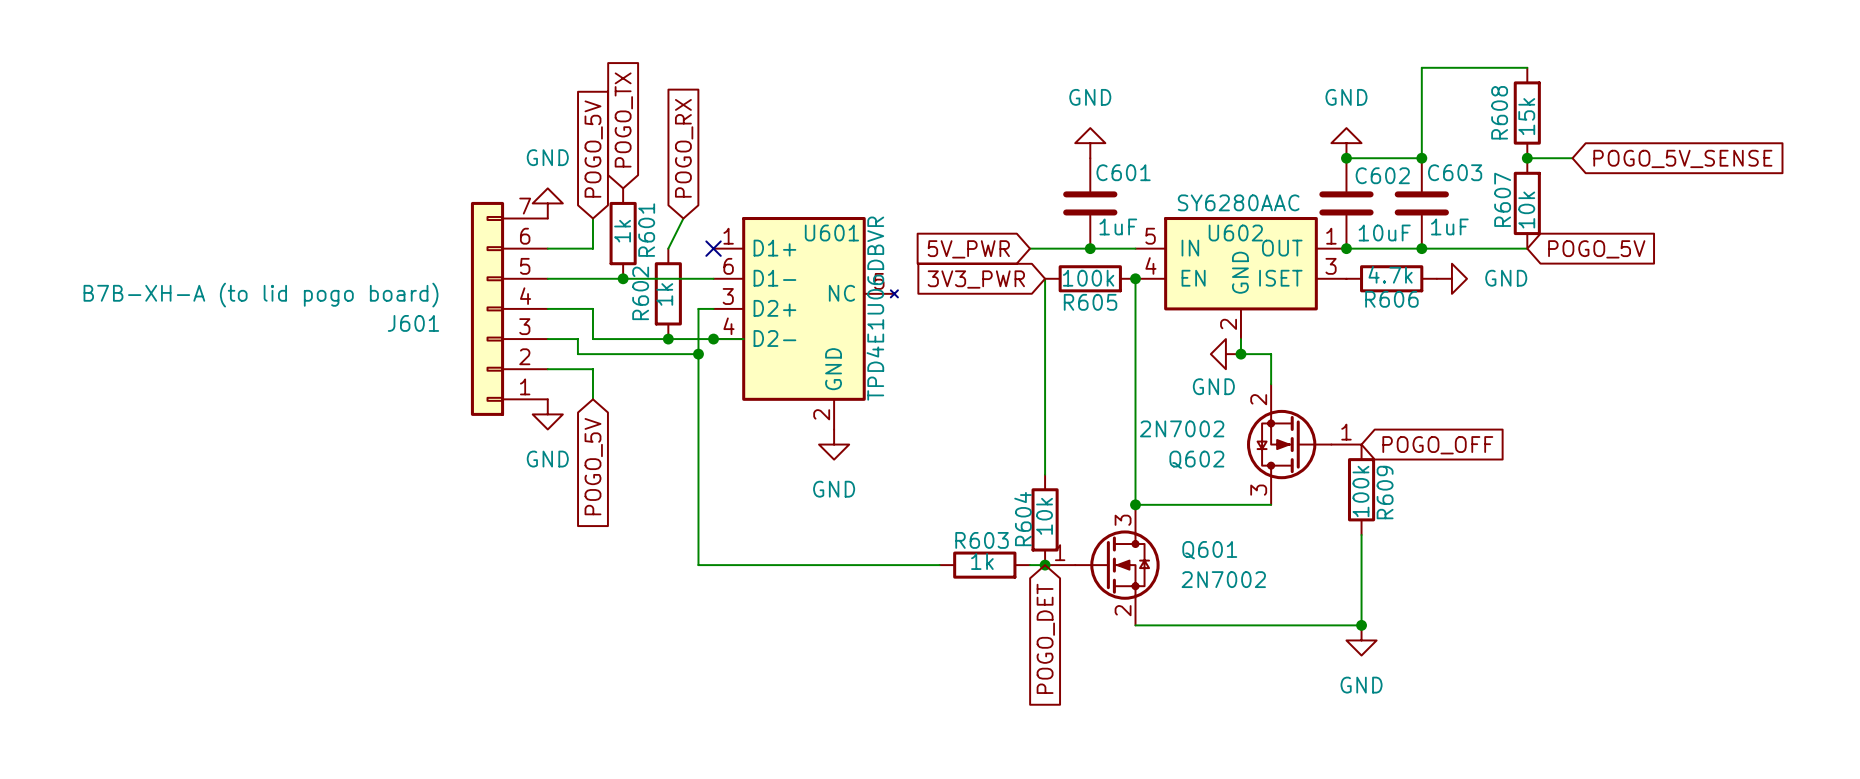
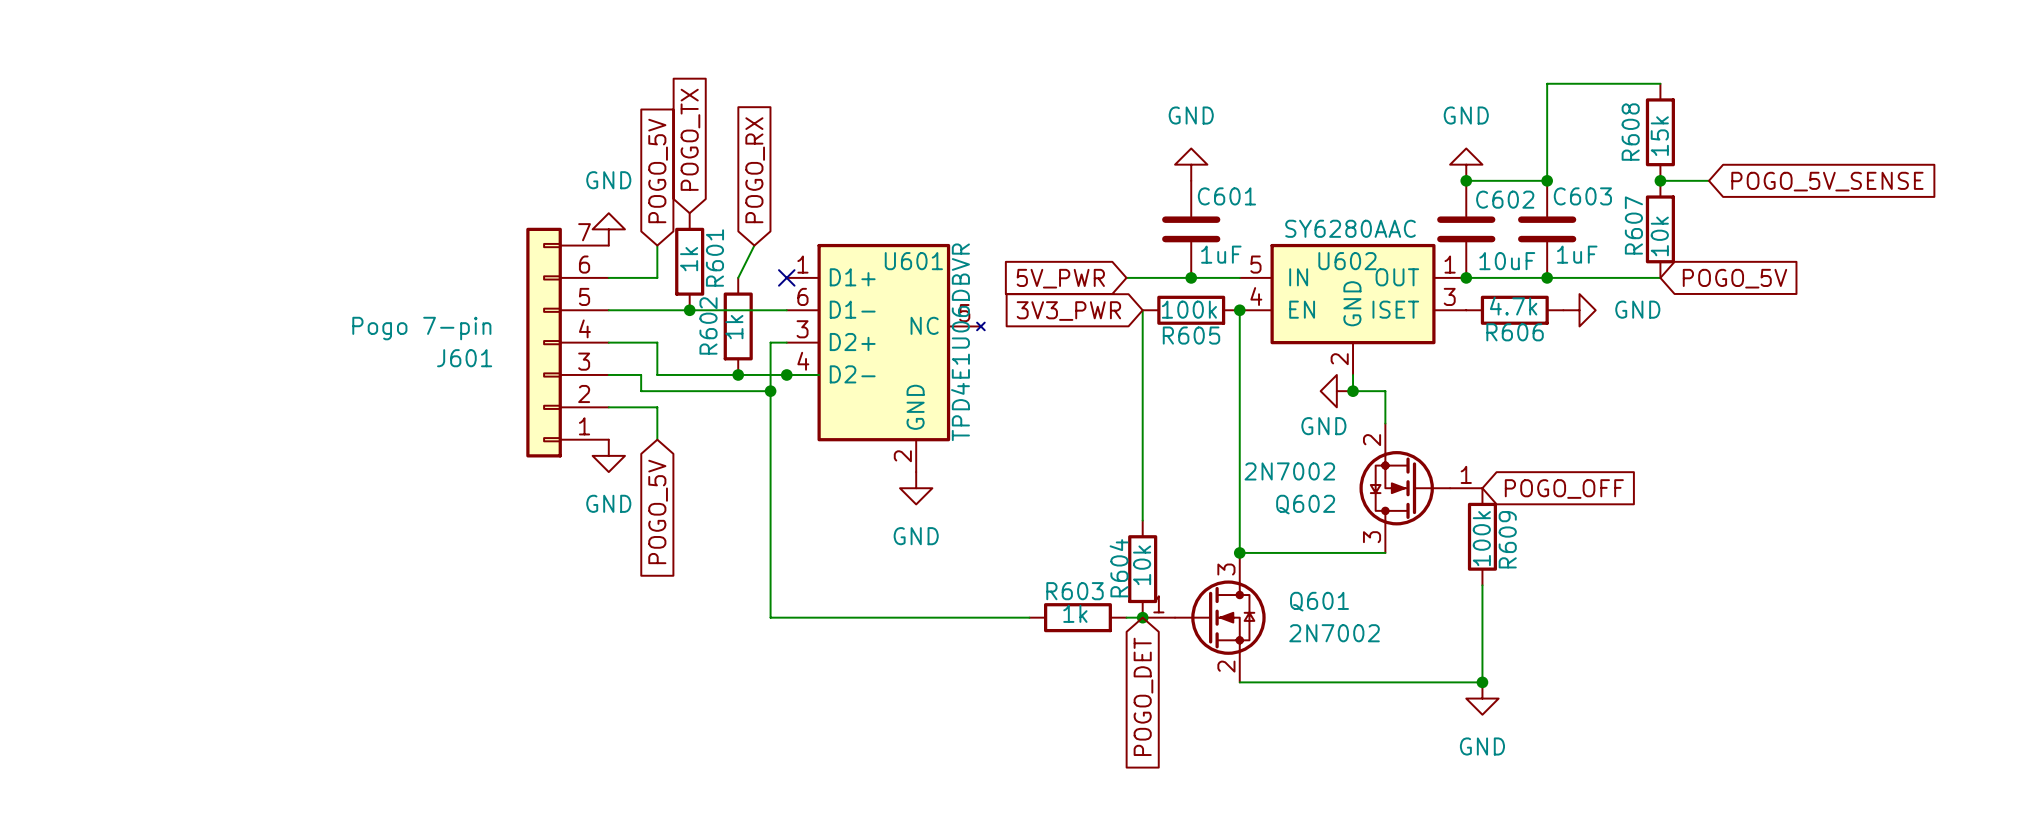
J601 value: B7B-XH-A (to lid pogo board) (260, 295) -> Pogo 7-pin (421, 328)

